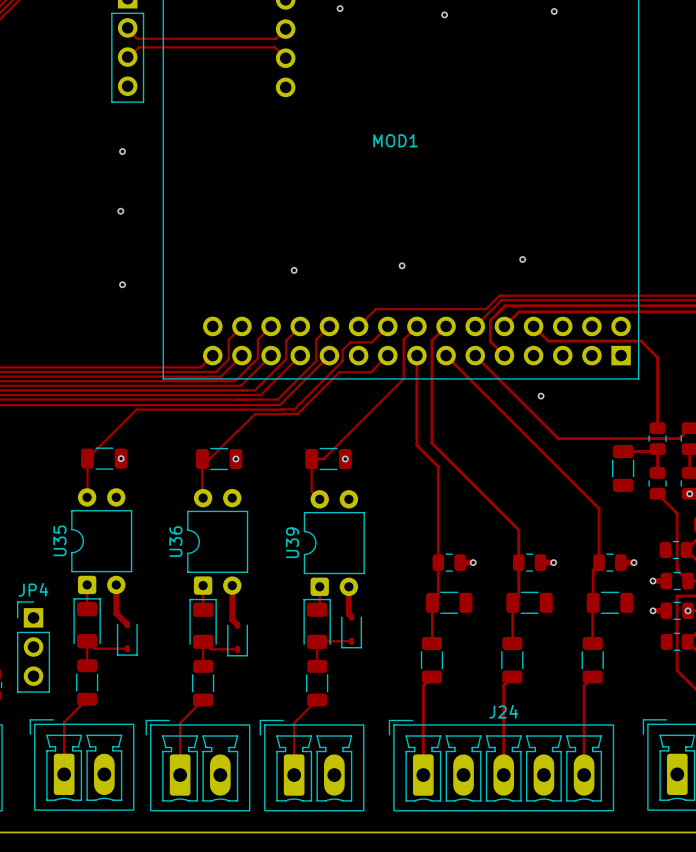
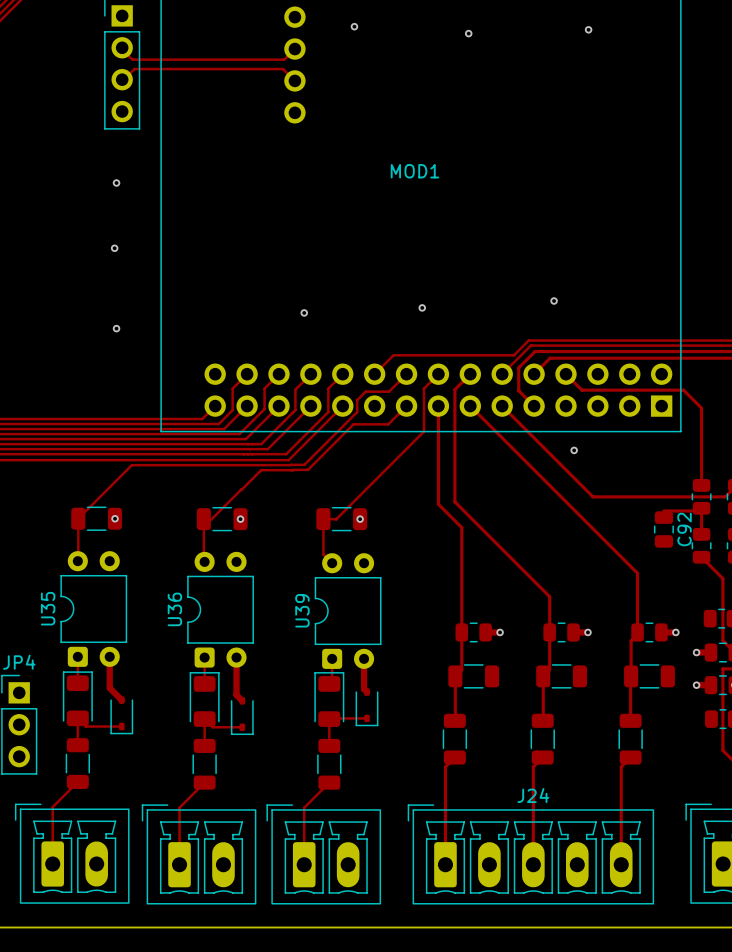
part: (623, 468) -> none
C92: none -> (663, 529)

